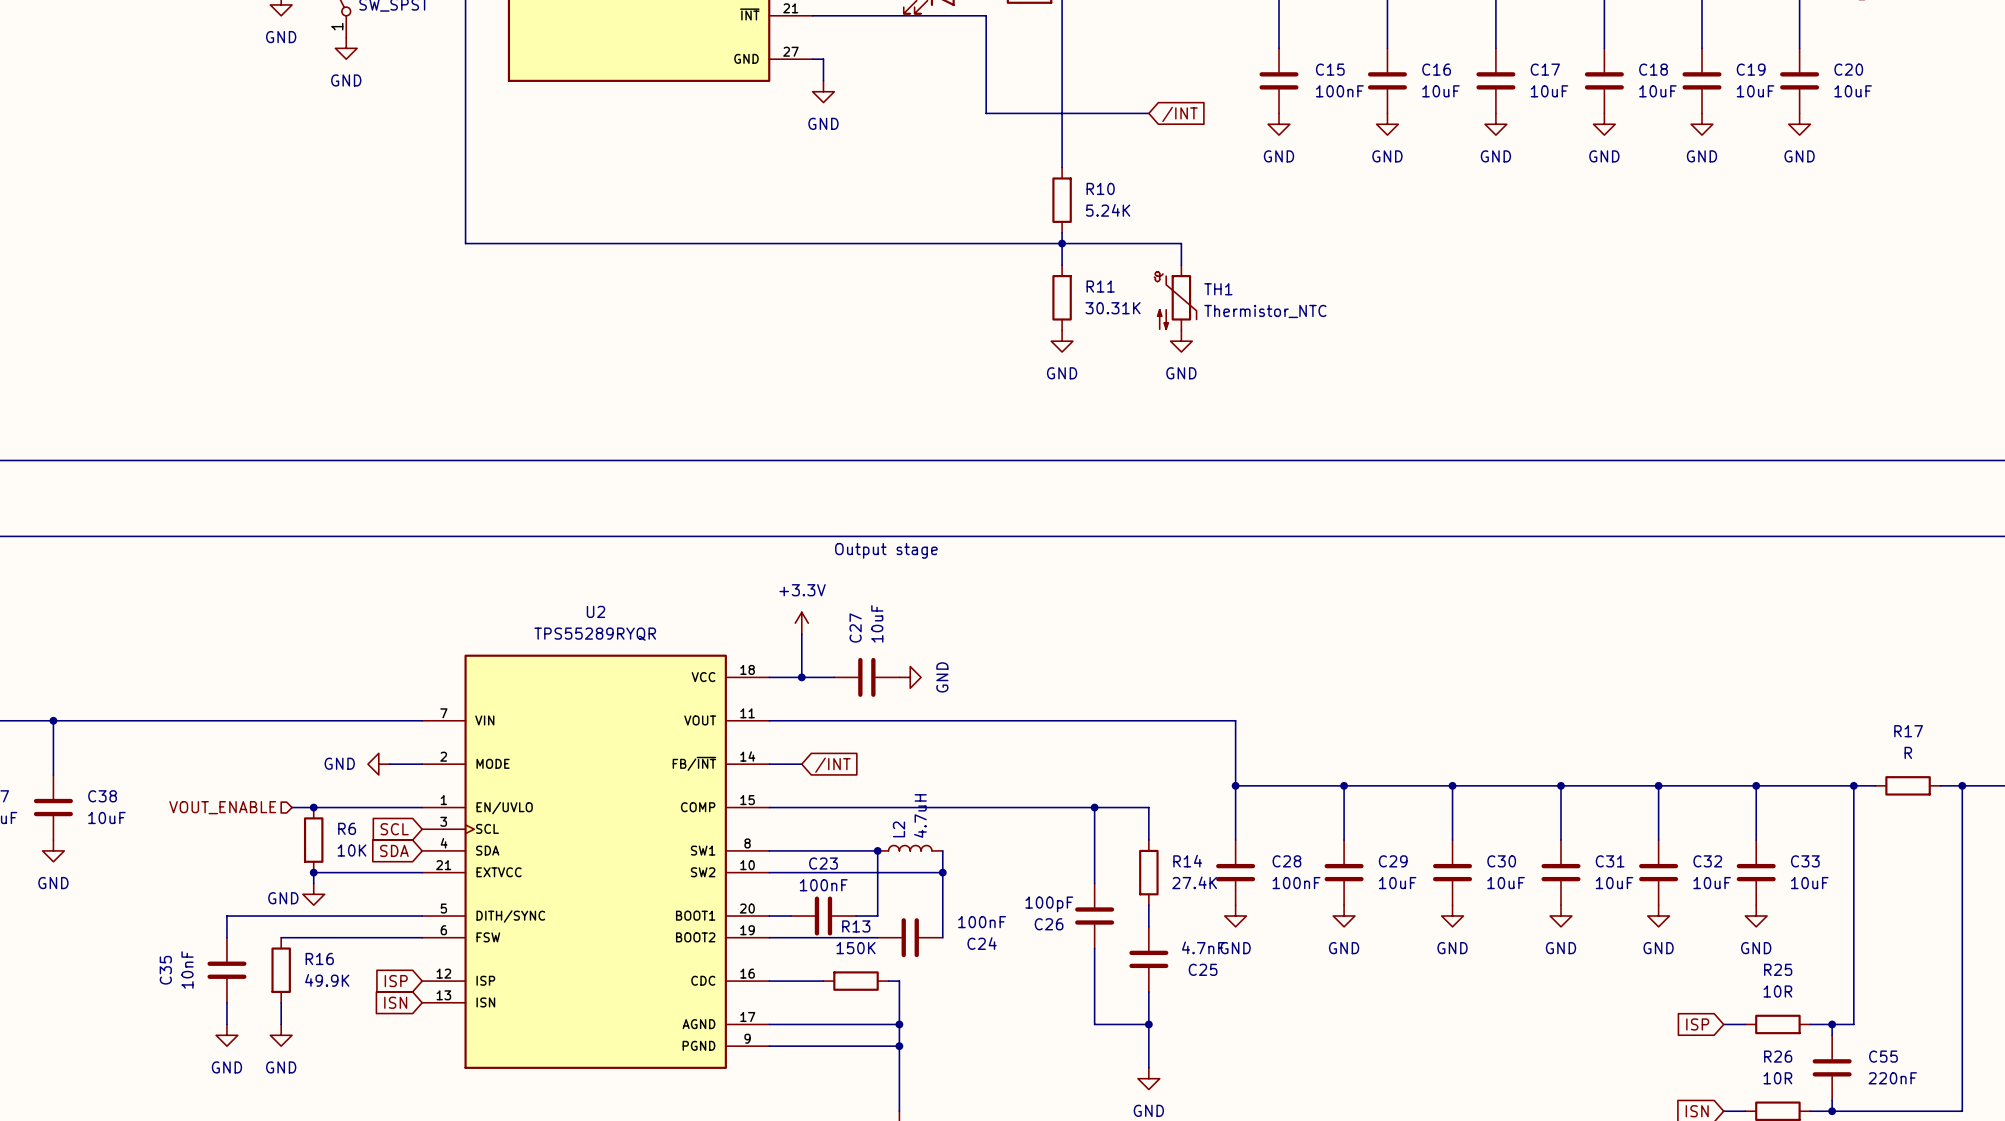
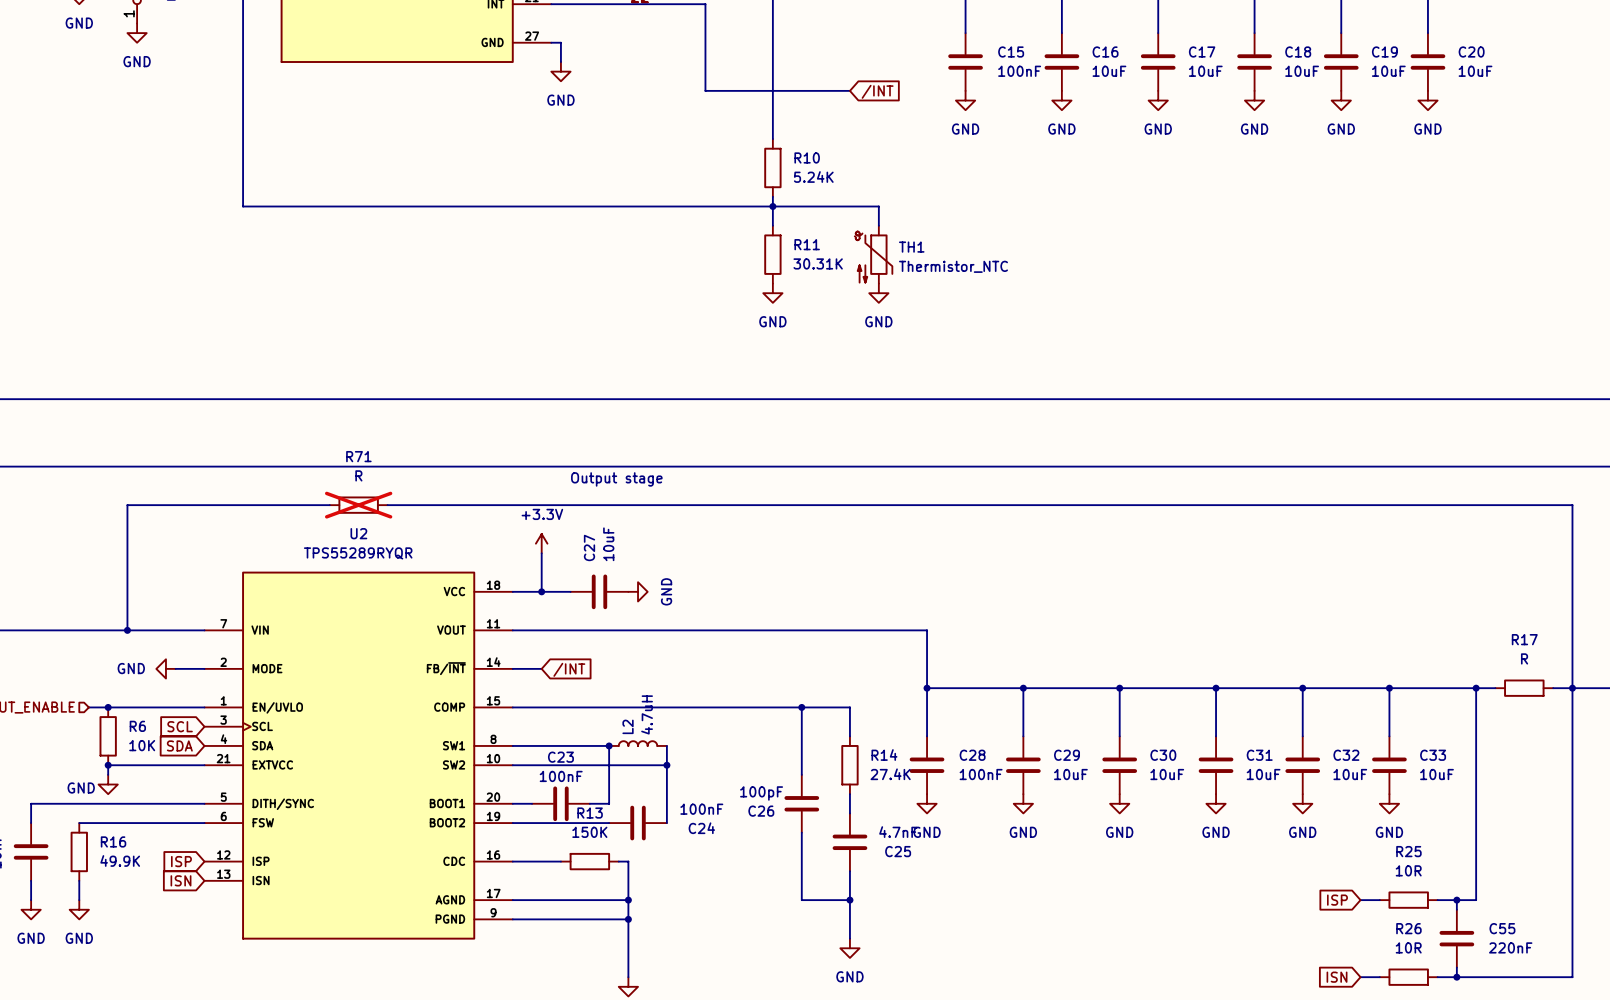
wire: none -> (329, 505) (127, 505) (127, 630)
R71: none -> R (358, 505)
wire: none -> (387, 505) (1572, 505) (1572, 688)
junction: none -> (127, 630)

